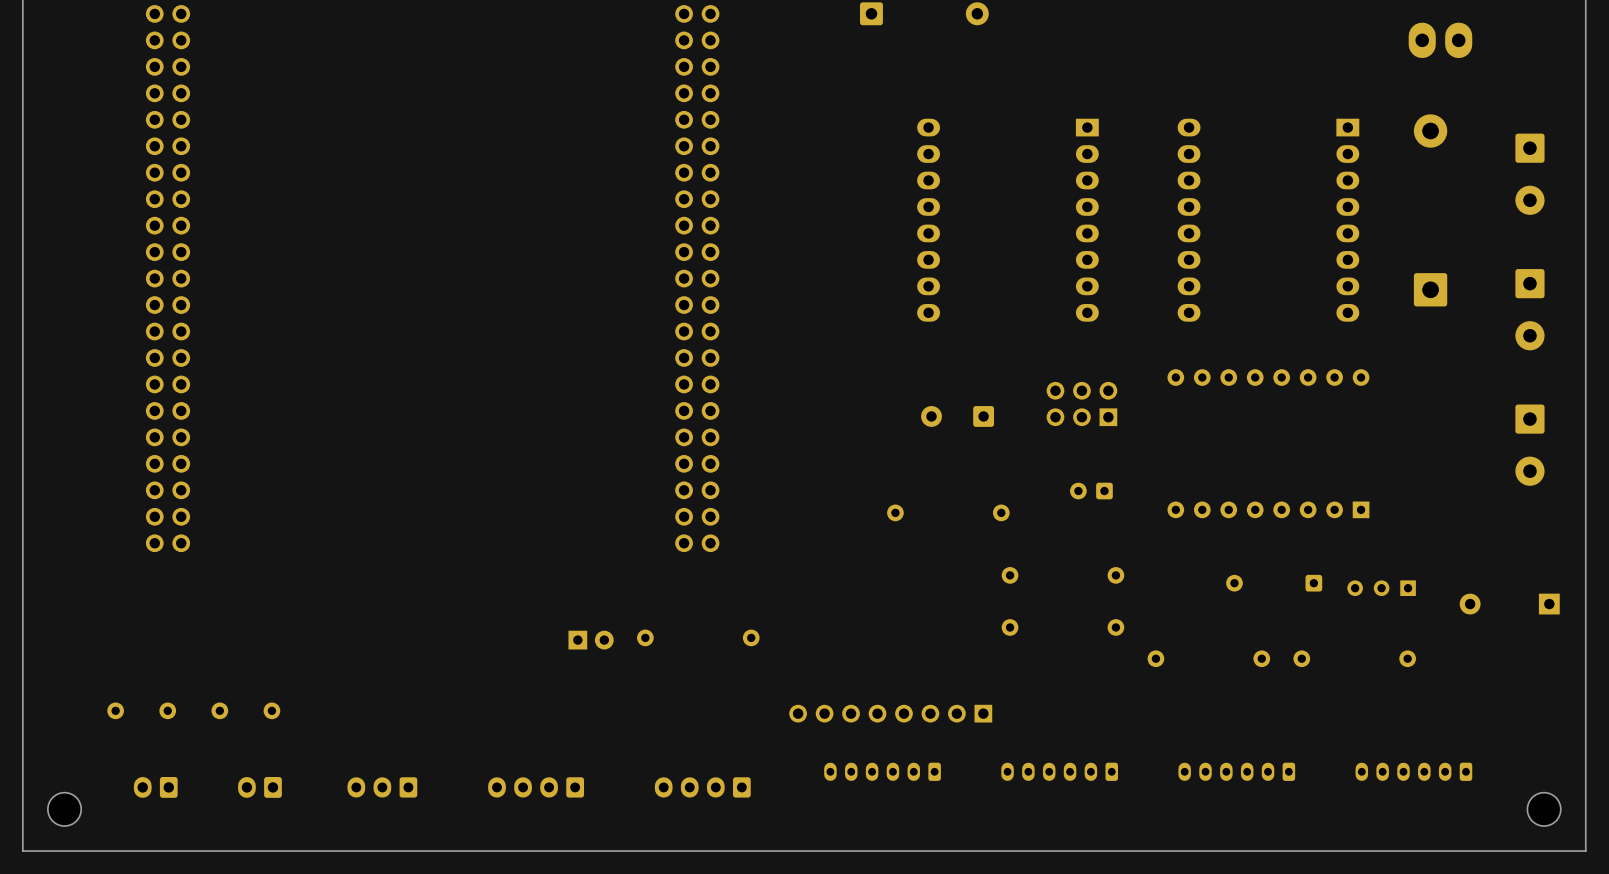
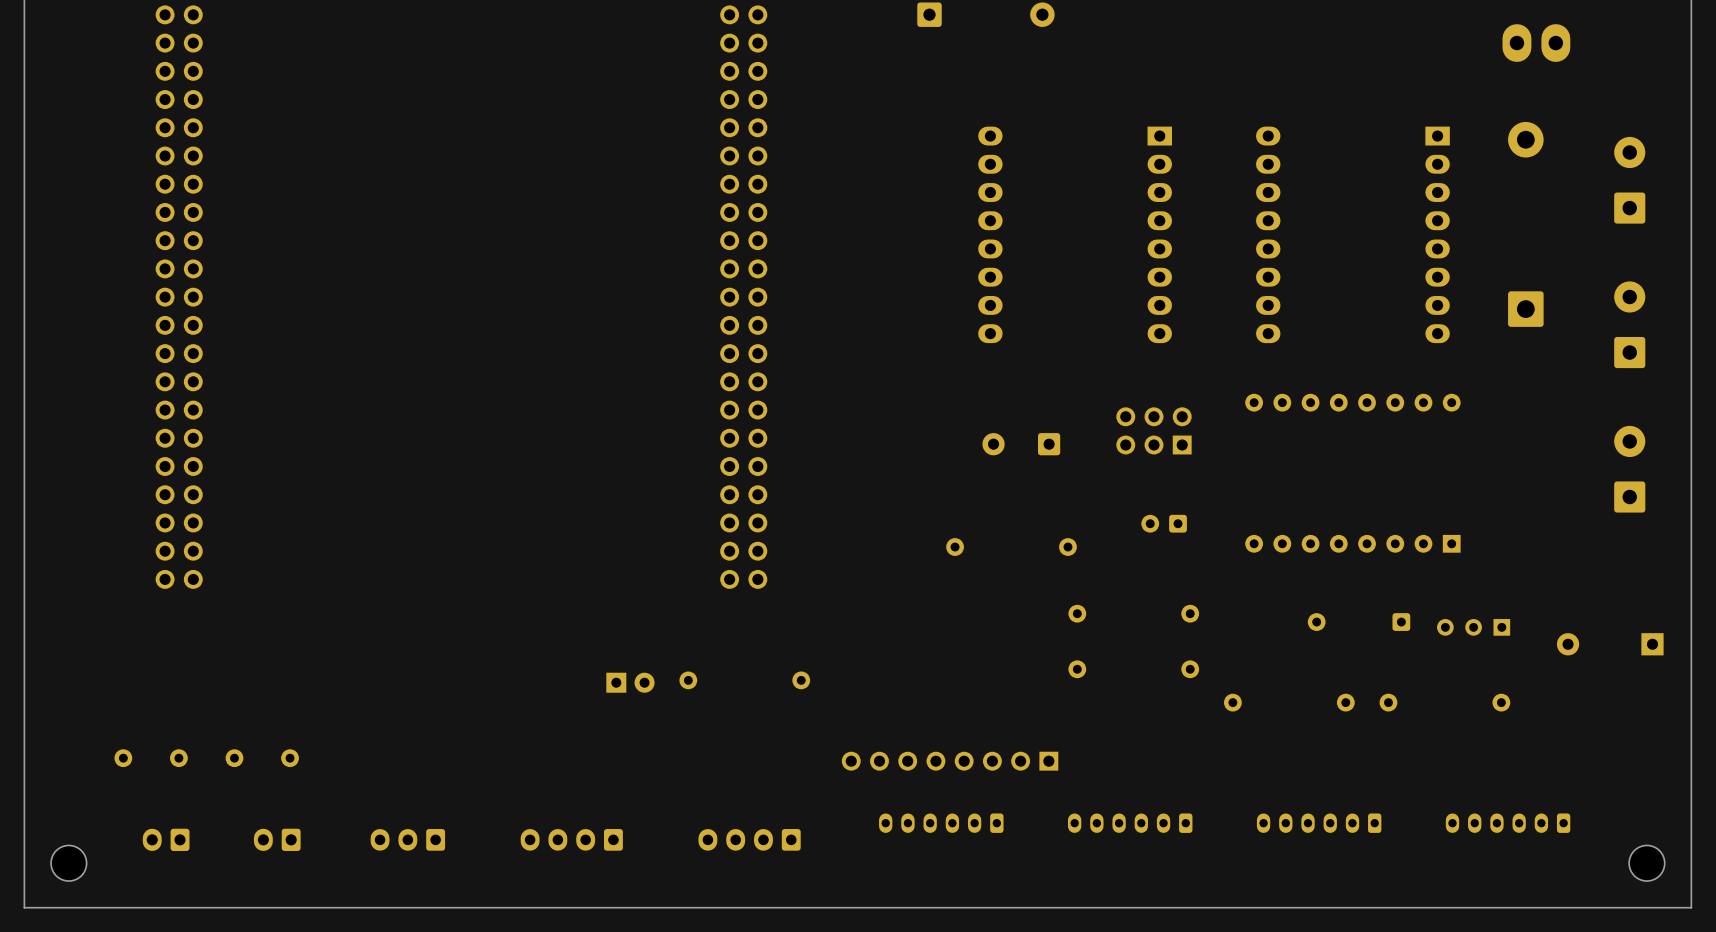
part rotation: 0° (1529, 174) -> 180° (1629, 180)
part rotation: 0° (1529, 309) -> 180° (1629, 324)
part rotation: 0° (1529, 445) -> 180° (1629, 469)

